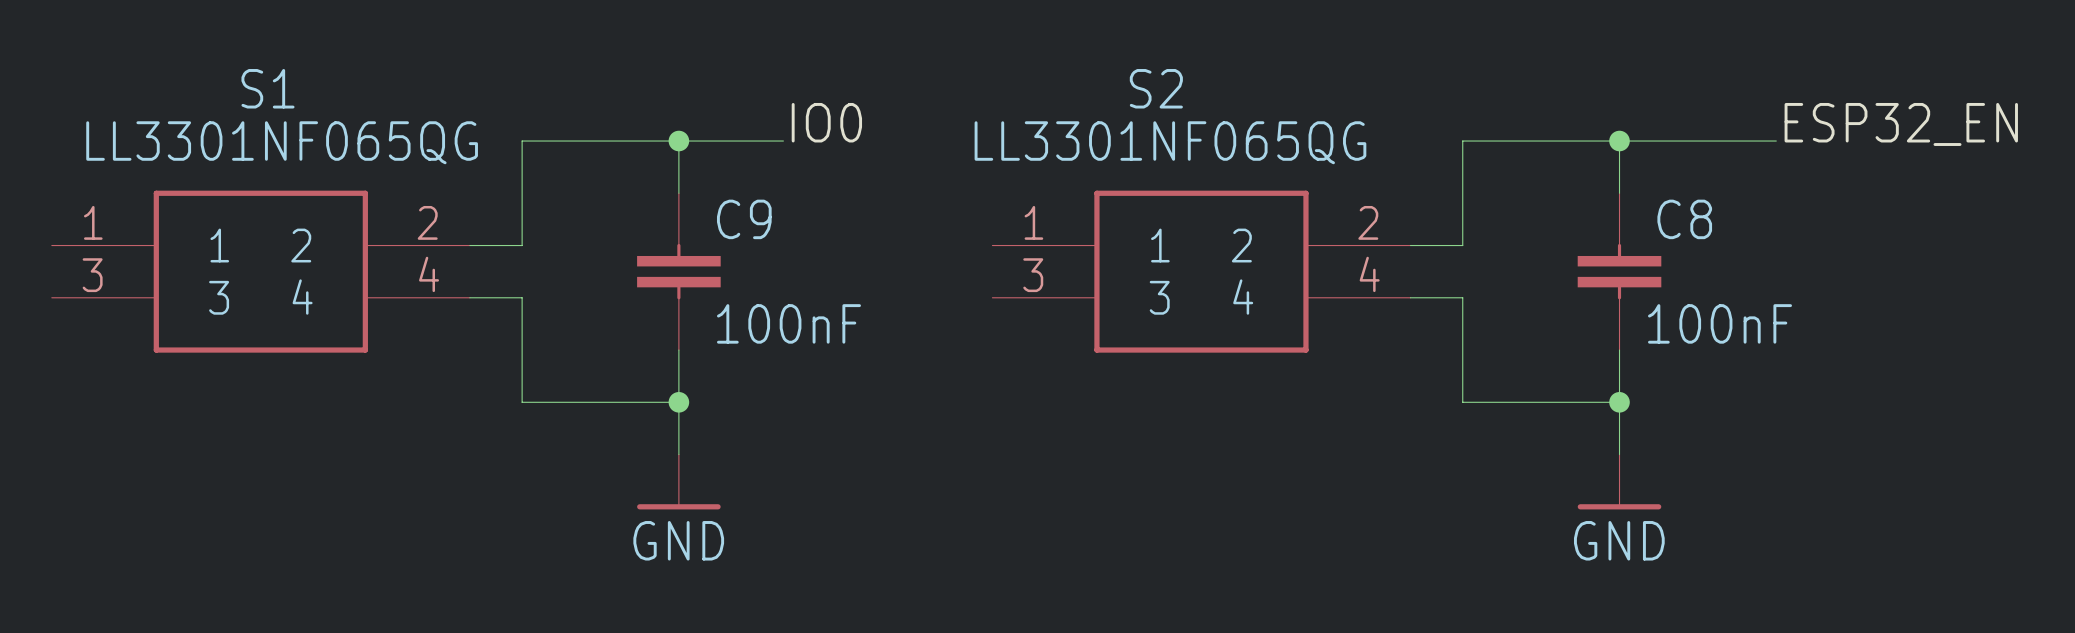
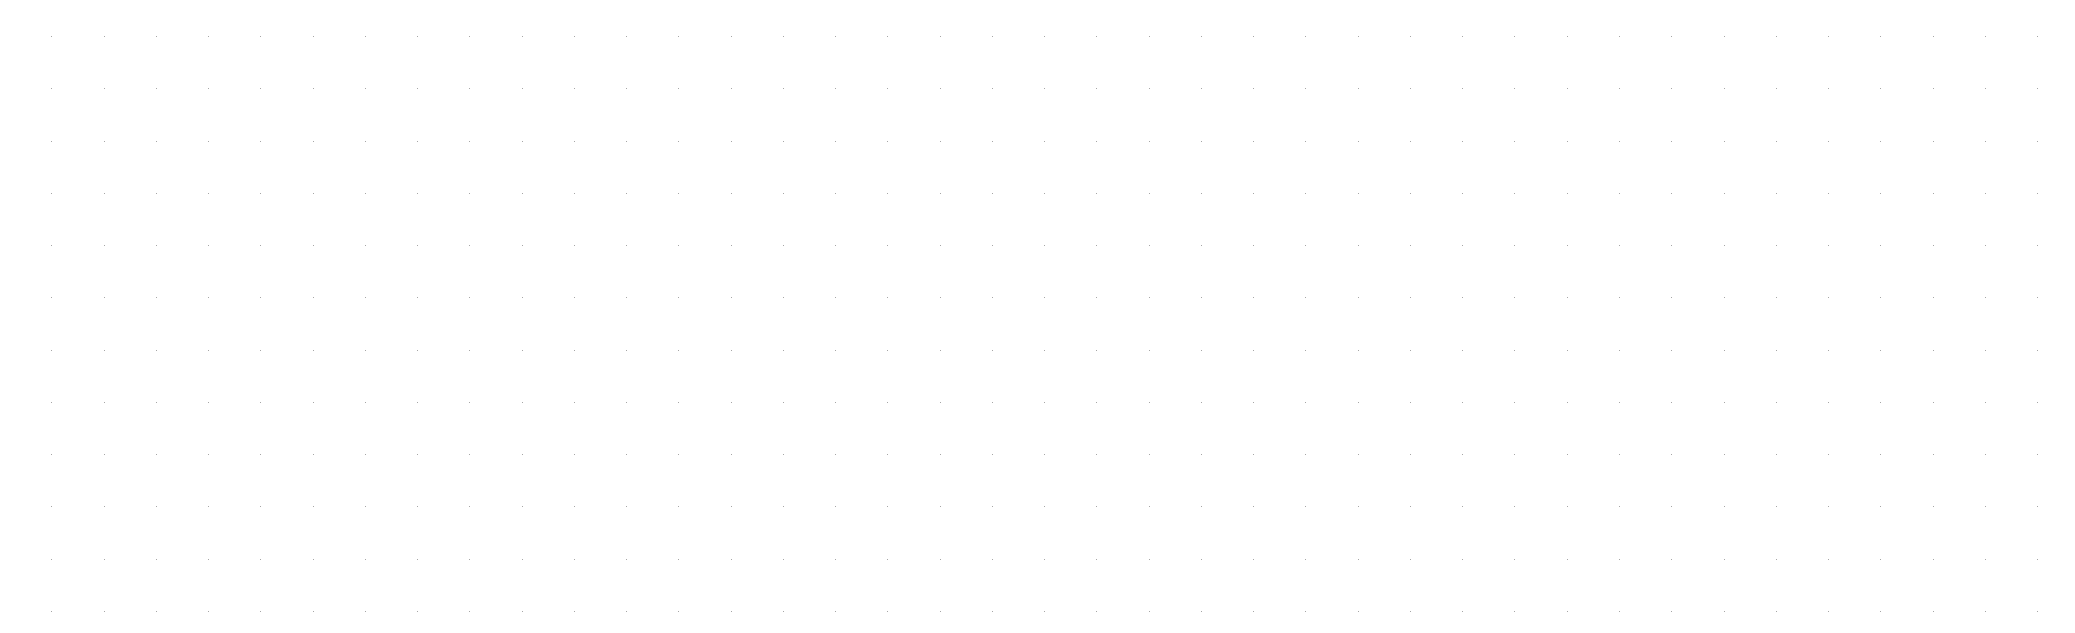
label: IO0 (826, 122) -> none
label: ESP32_EN (1901, 124) -> none
wire: (678, 141) (678, 193) -> none
junction: (678, 141) -> none
wire: (783, 141) (522, 141) (522, 245) (469, 245) -> none
wire: (1619, 141) (1619, 193) -> none
junction: (1619, 141) -> none
wire: (1776, 141) (1462, 141) (1462, 245) (1410, 245) -> none
S1: LL3301NF065QG (260, 271) -> none
C9: 100nF (678, 271) -> none
S2: LL3301NF065QG (1201, 271) -> none
C8: 100nF (1619, 271) -> none
wire: (469, 297) (522, 297) (522, 402) (678, 402) -> none
wire: (1410, 297) (1462, 297) (1462, 402) (1619, 402) -> none
wire: (678, 350) (678, 454) -> none
wire: (1619, 350) (1619, 454) -> none
junction: (678, 402) -> none
junction: (1619, 402) -> none
power symbol: GND (678, 481) -> none
power symbol: GND (1619, 481) -> none

